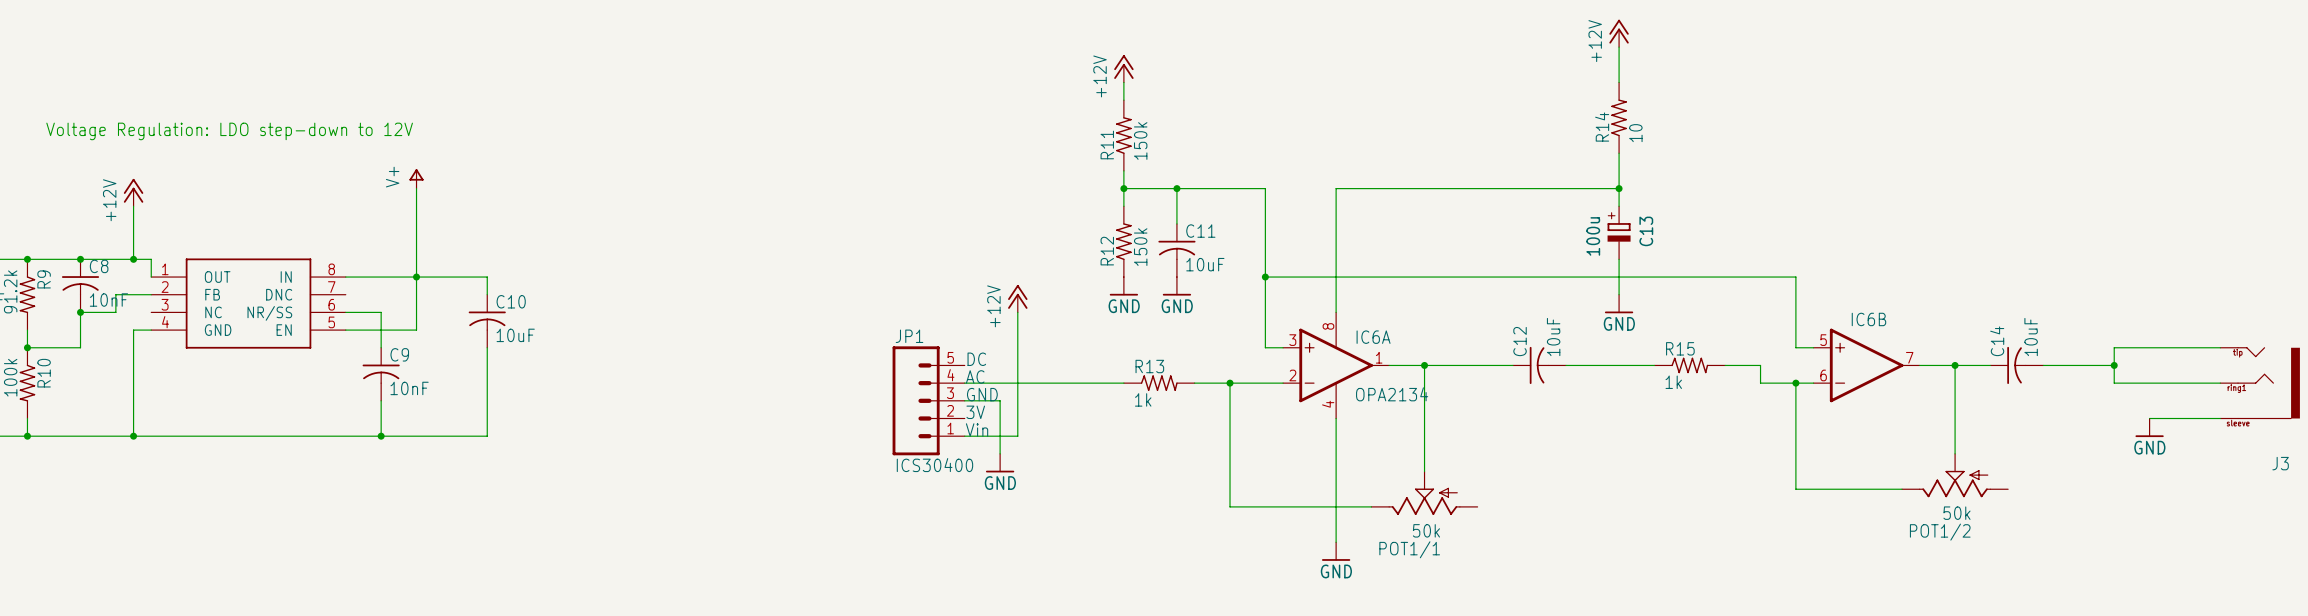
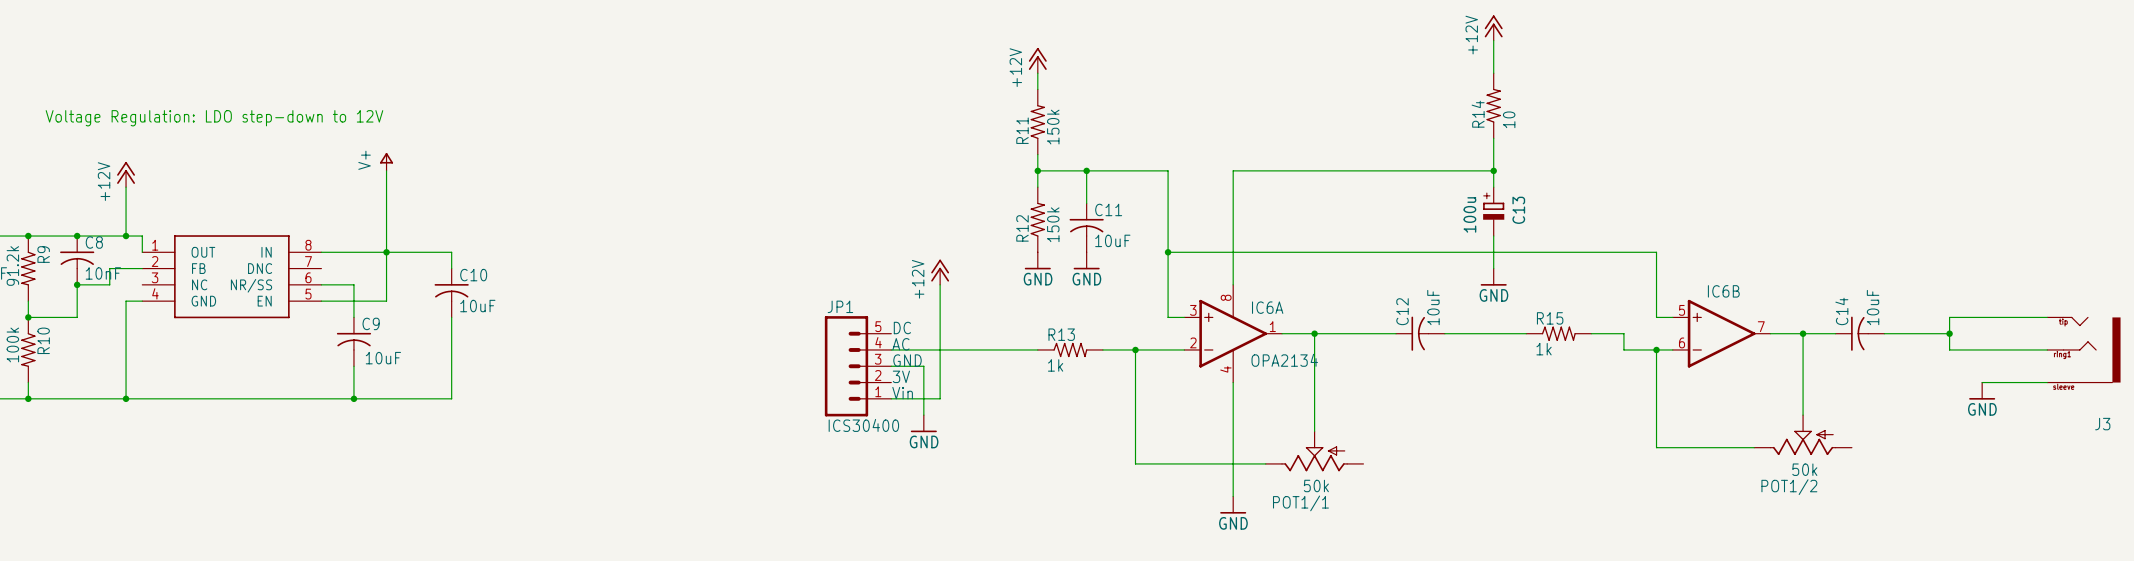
C9 value: 10nF (409, 388) -> 10uF (383, 358)

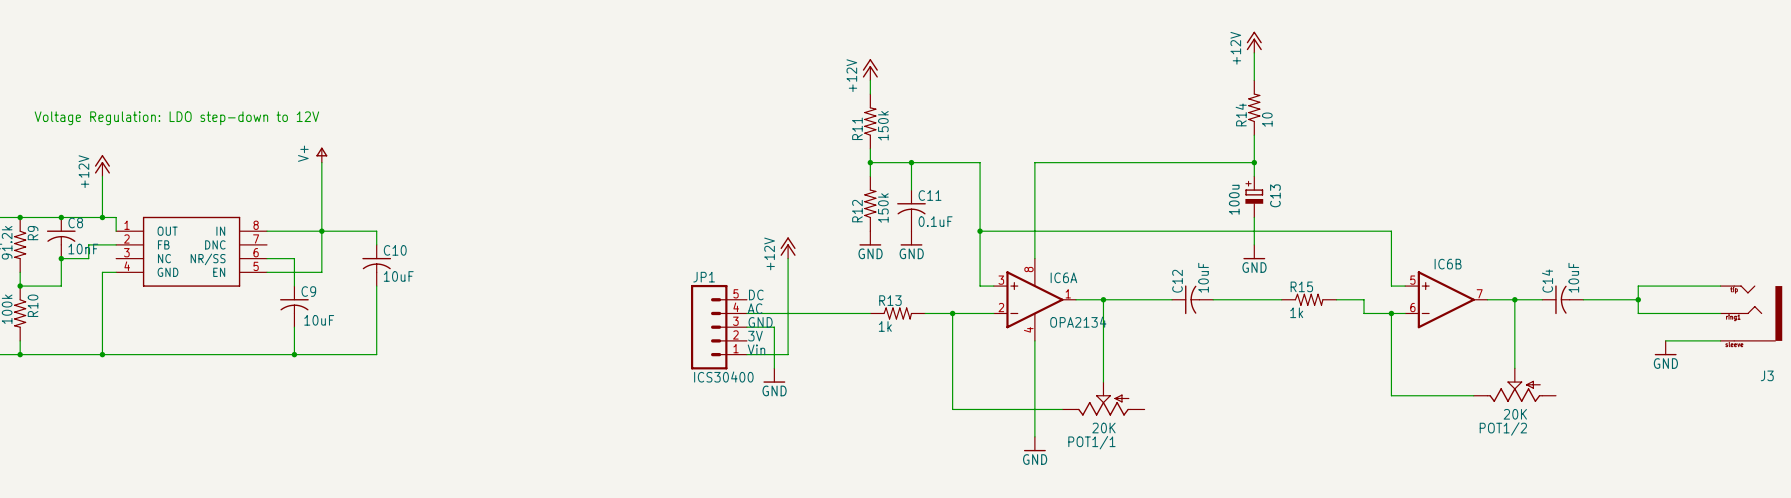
C11 value: 10uF (1112, 240) -> 0.1uF (935, 221)
POT1/2 value: 50k (1804, 469) -> 20K (1515, 414)
POT1/1 value: 50k (1316, 485) -> 20K (1103, 428)

